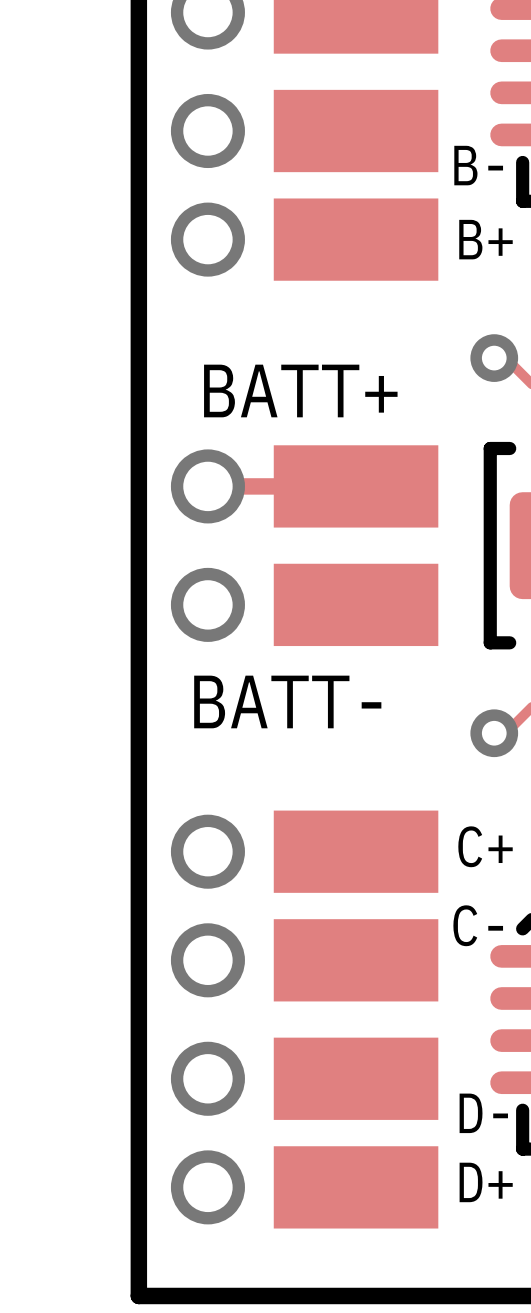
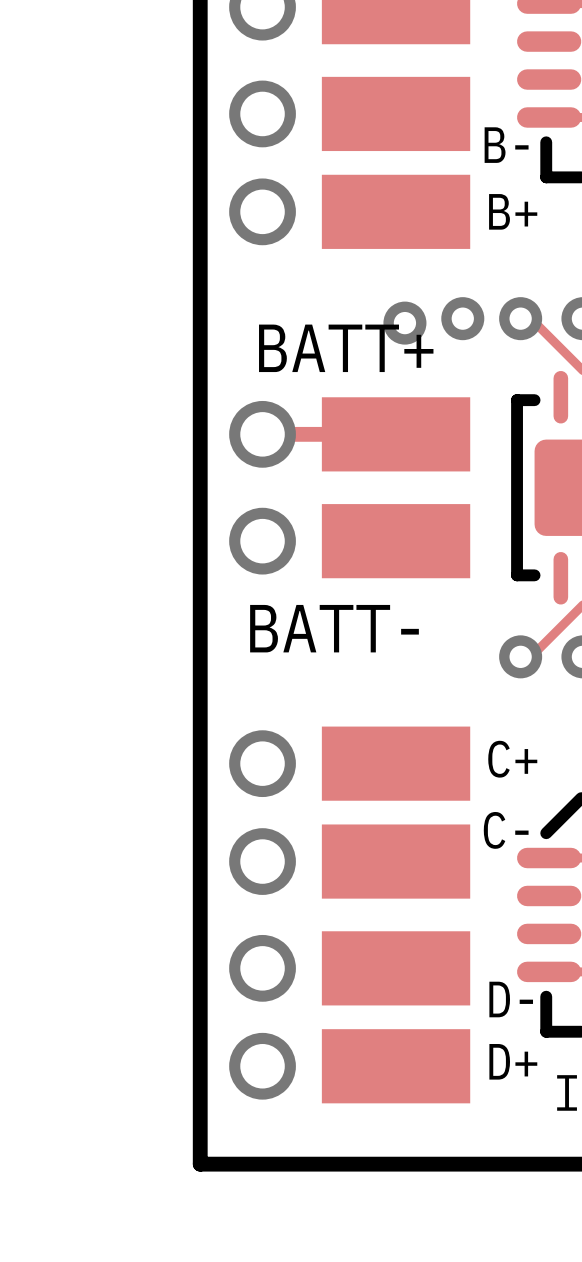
via: none -> (462, 318)
via: none -> (404, 323)

